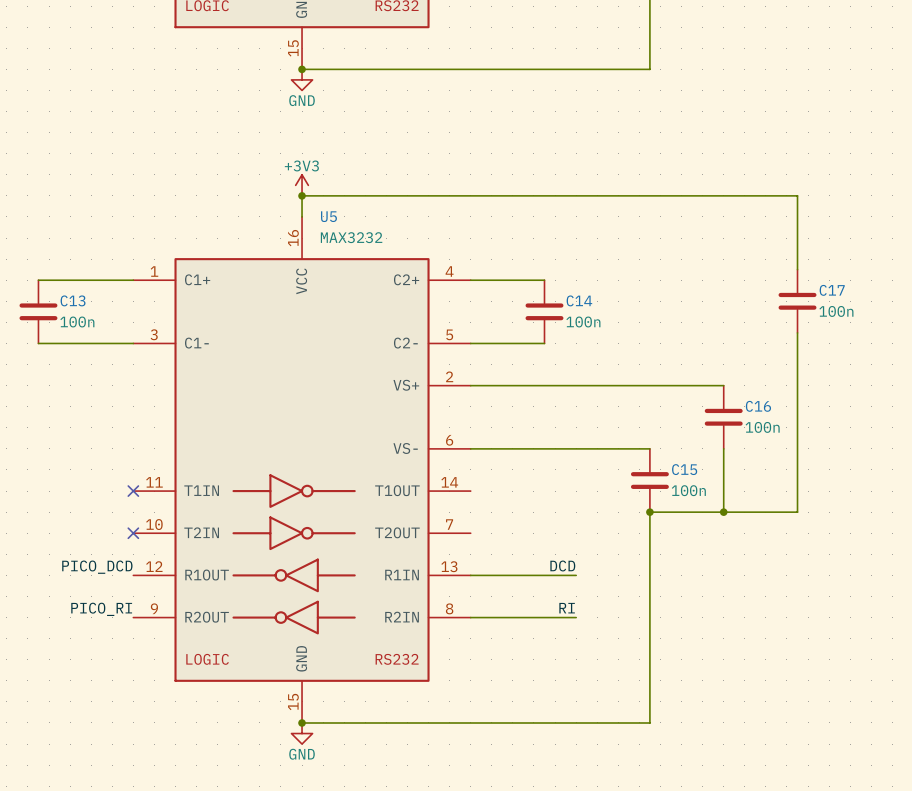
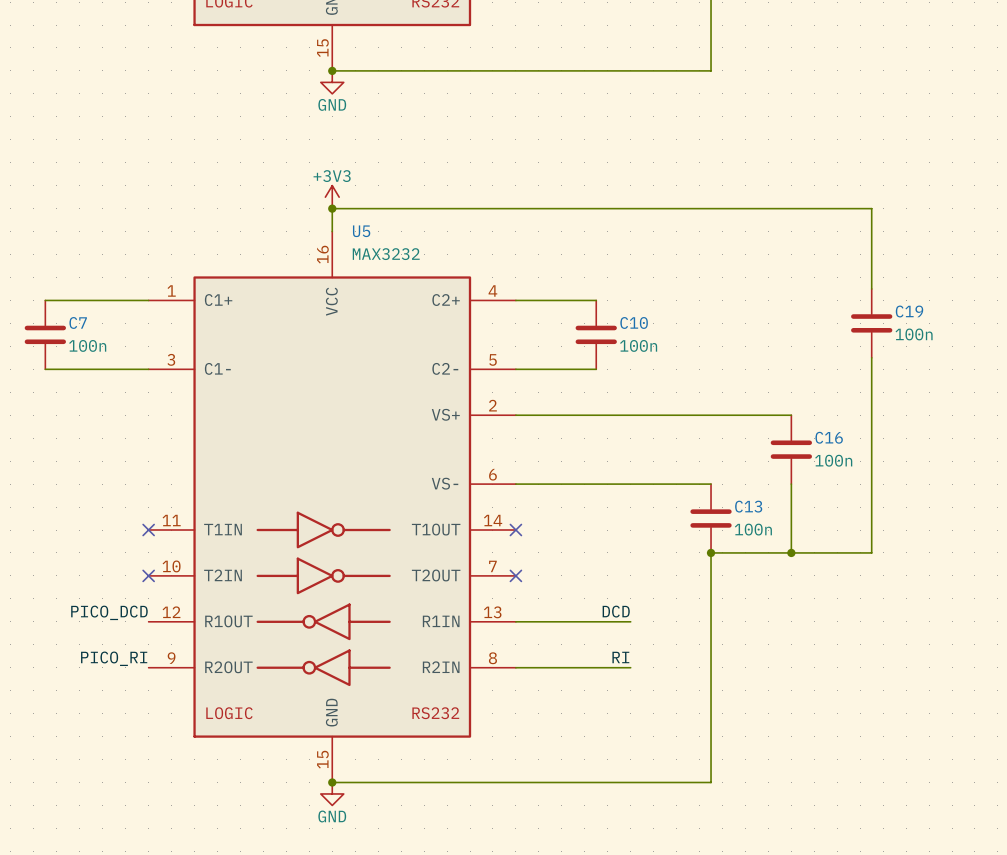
C17 name: C17 (832, 290) -> C19 (909, 311)
C13 name: C13 (73, 300) -> C7 (78, 322)
C14 name: C14 (579, 300) -> C10 (634, 322)
C15 name: C15 (684, 469) -> C13 (748, 506)
no-connect mark: none -> (515, 530)
no-connect mark: none -> (515, 575)

